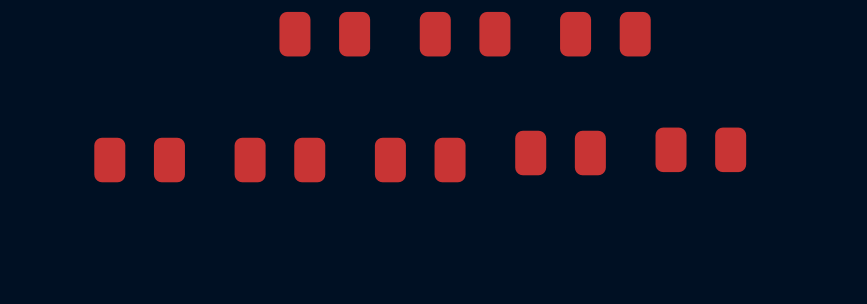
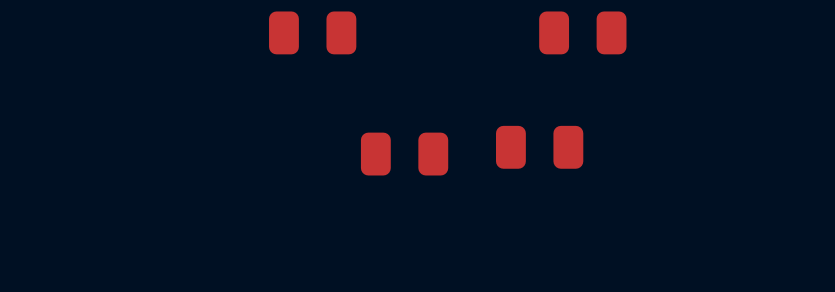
part: (465, 34) -> none
part: (700, 149) -> none
part: (139, 160) -> none
part: (279, 160) -> none

